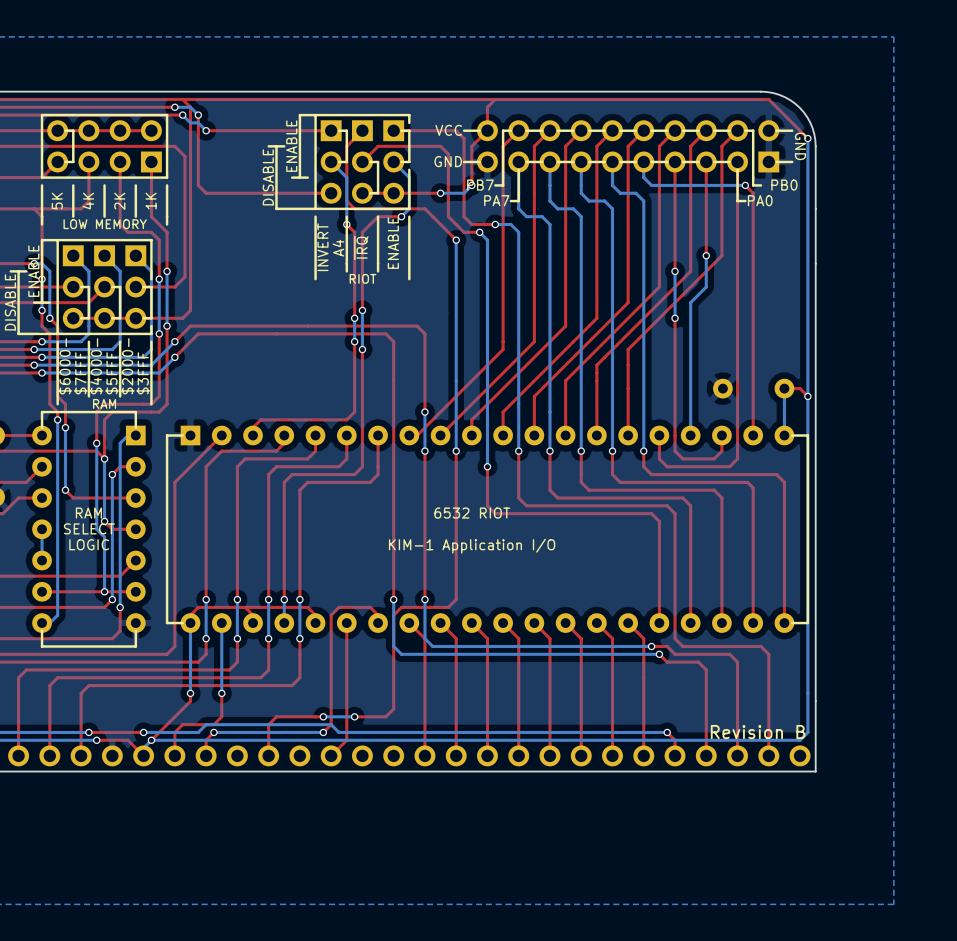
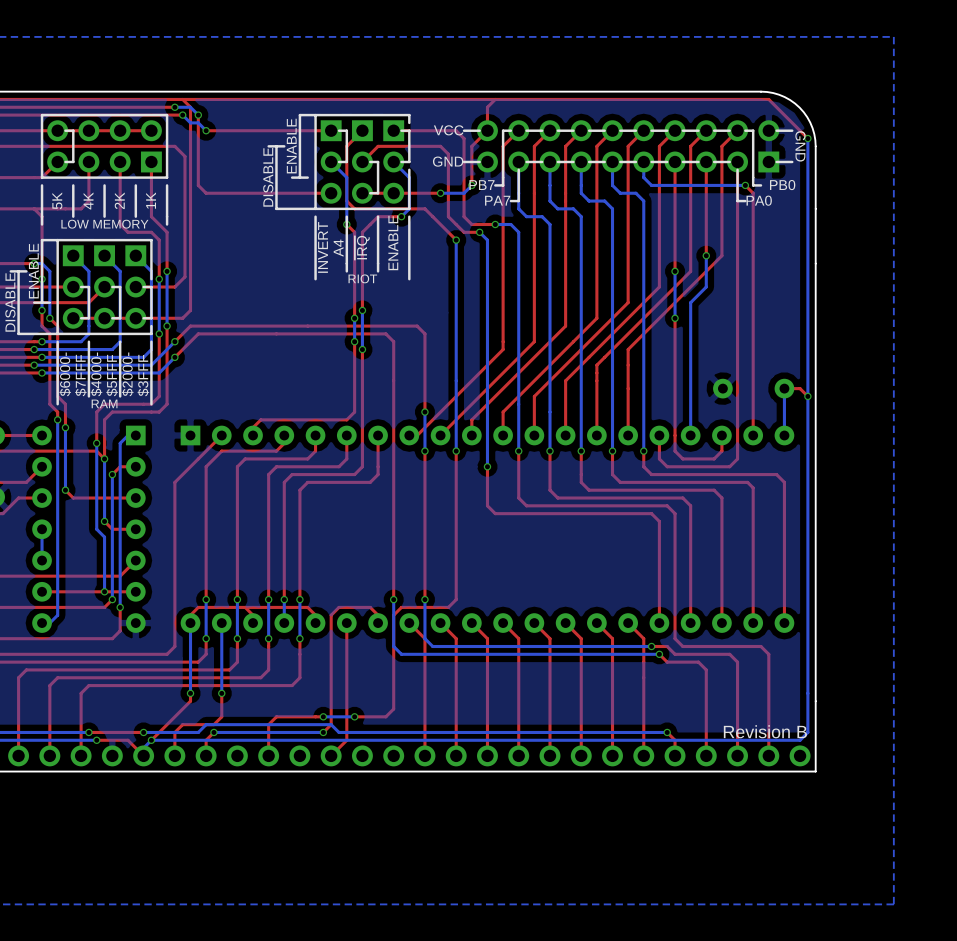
line: (135, 427) (135, 412) (42, 412) (42, 427) -> none
line: (182, 435) (167, 435) (167, 623) (182, 623) -> none
line: (792, 435) (807, 435) (807, 623) (792, 623) -> none
text: RAM (88, 513) -> none
text: 6532 RIOT (472, 513) -> none
text: SELECT (89, 528) -> none
text: LOGIC (89, 544) -> none
text: KIM-1 Application I/O (472, 546) -> none
line: (135, 630) (135, 646) (42, 646) (42, 630) -> none

